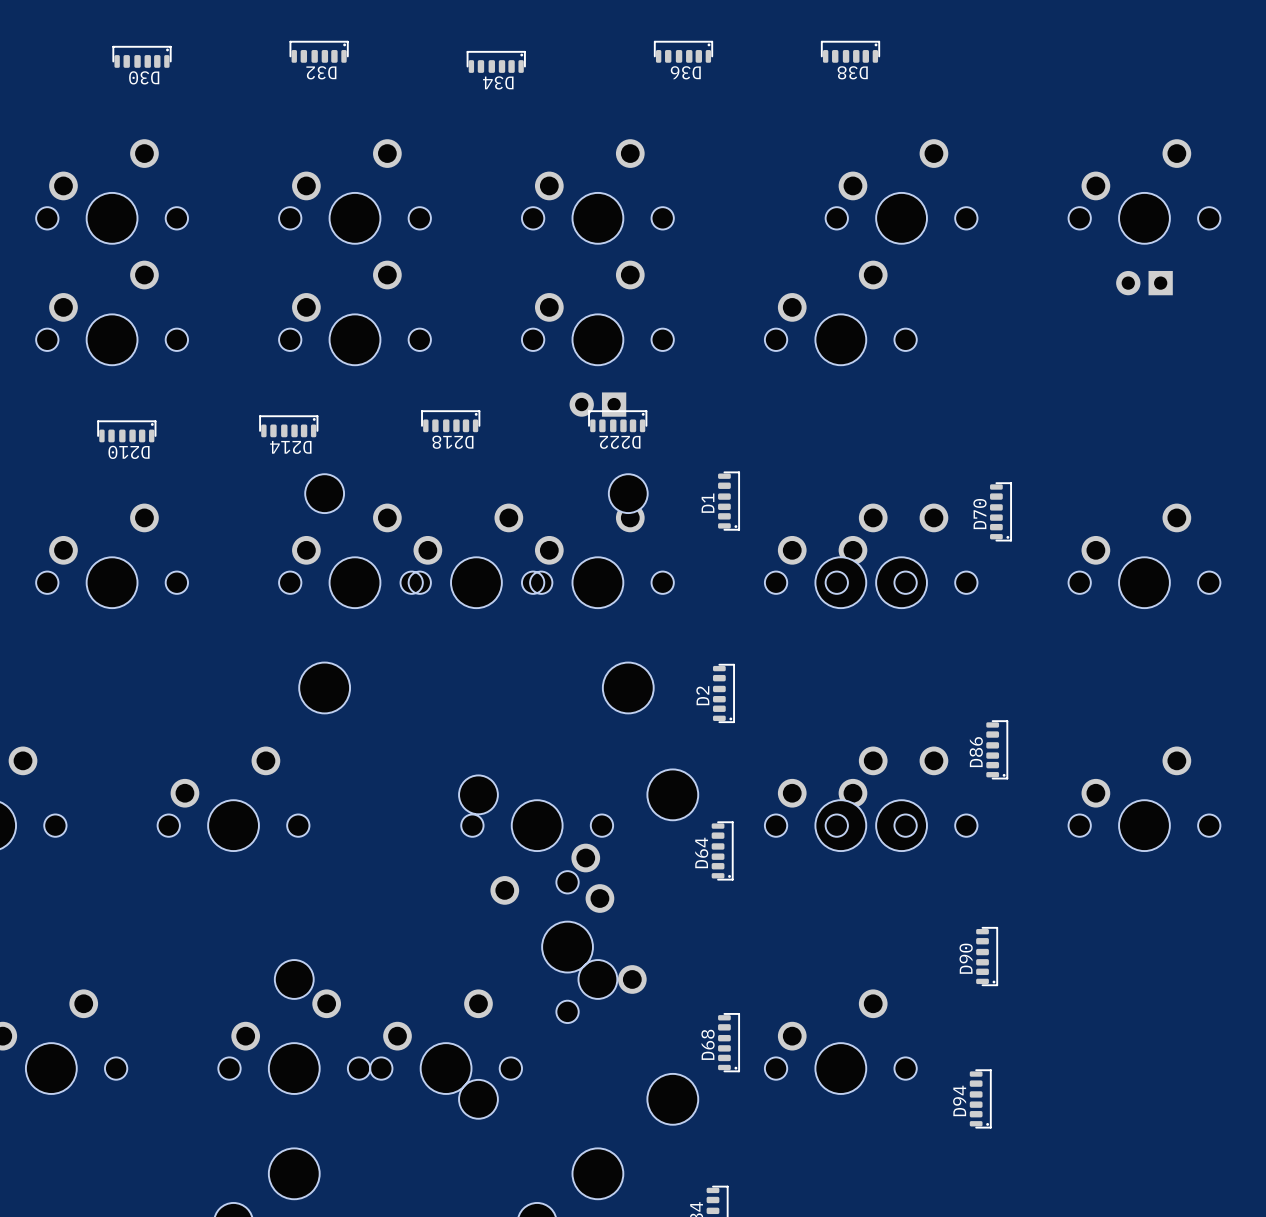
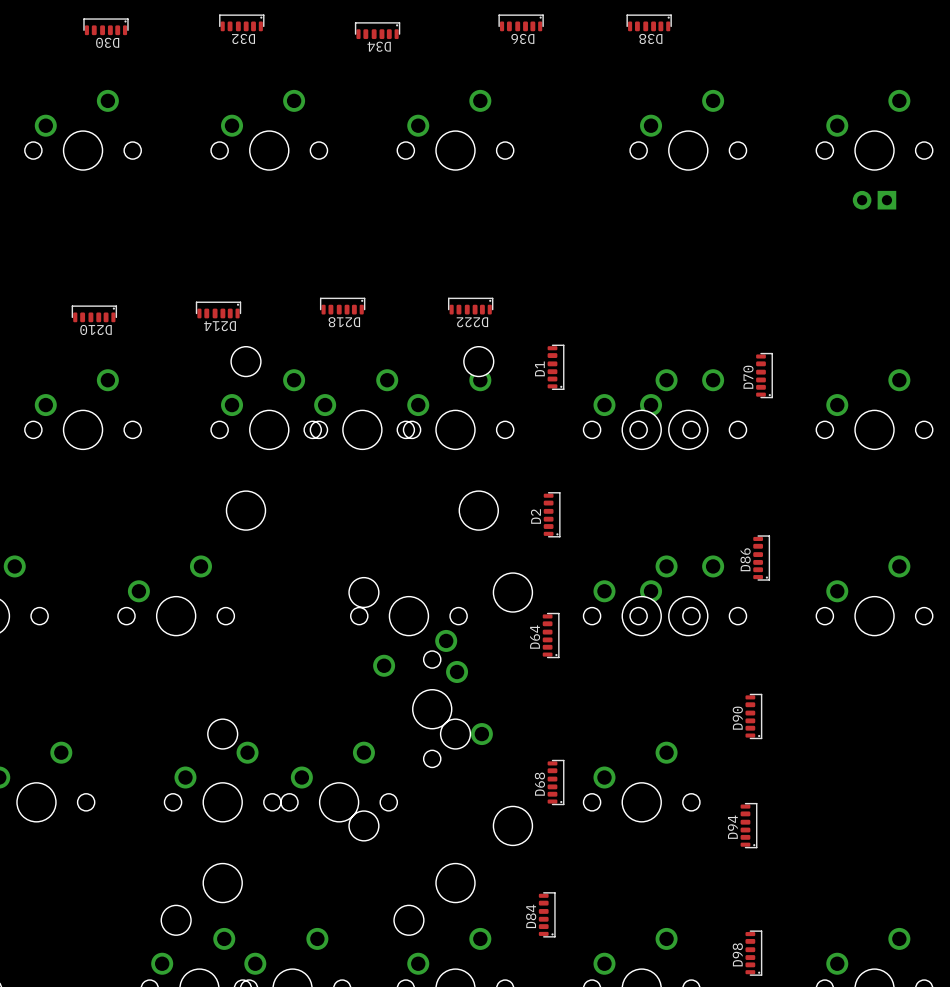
part: (112, 312) -> none
part: (354, 312) -> none
part: (840, 312) -> none
part: (597, 338) -> none

